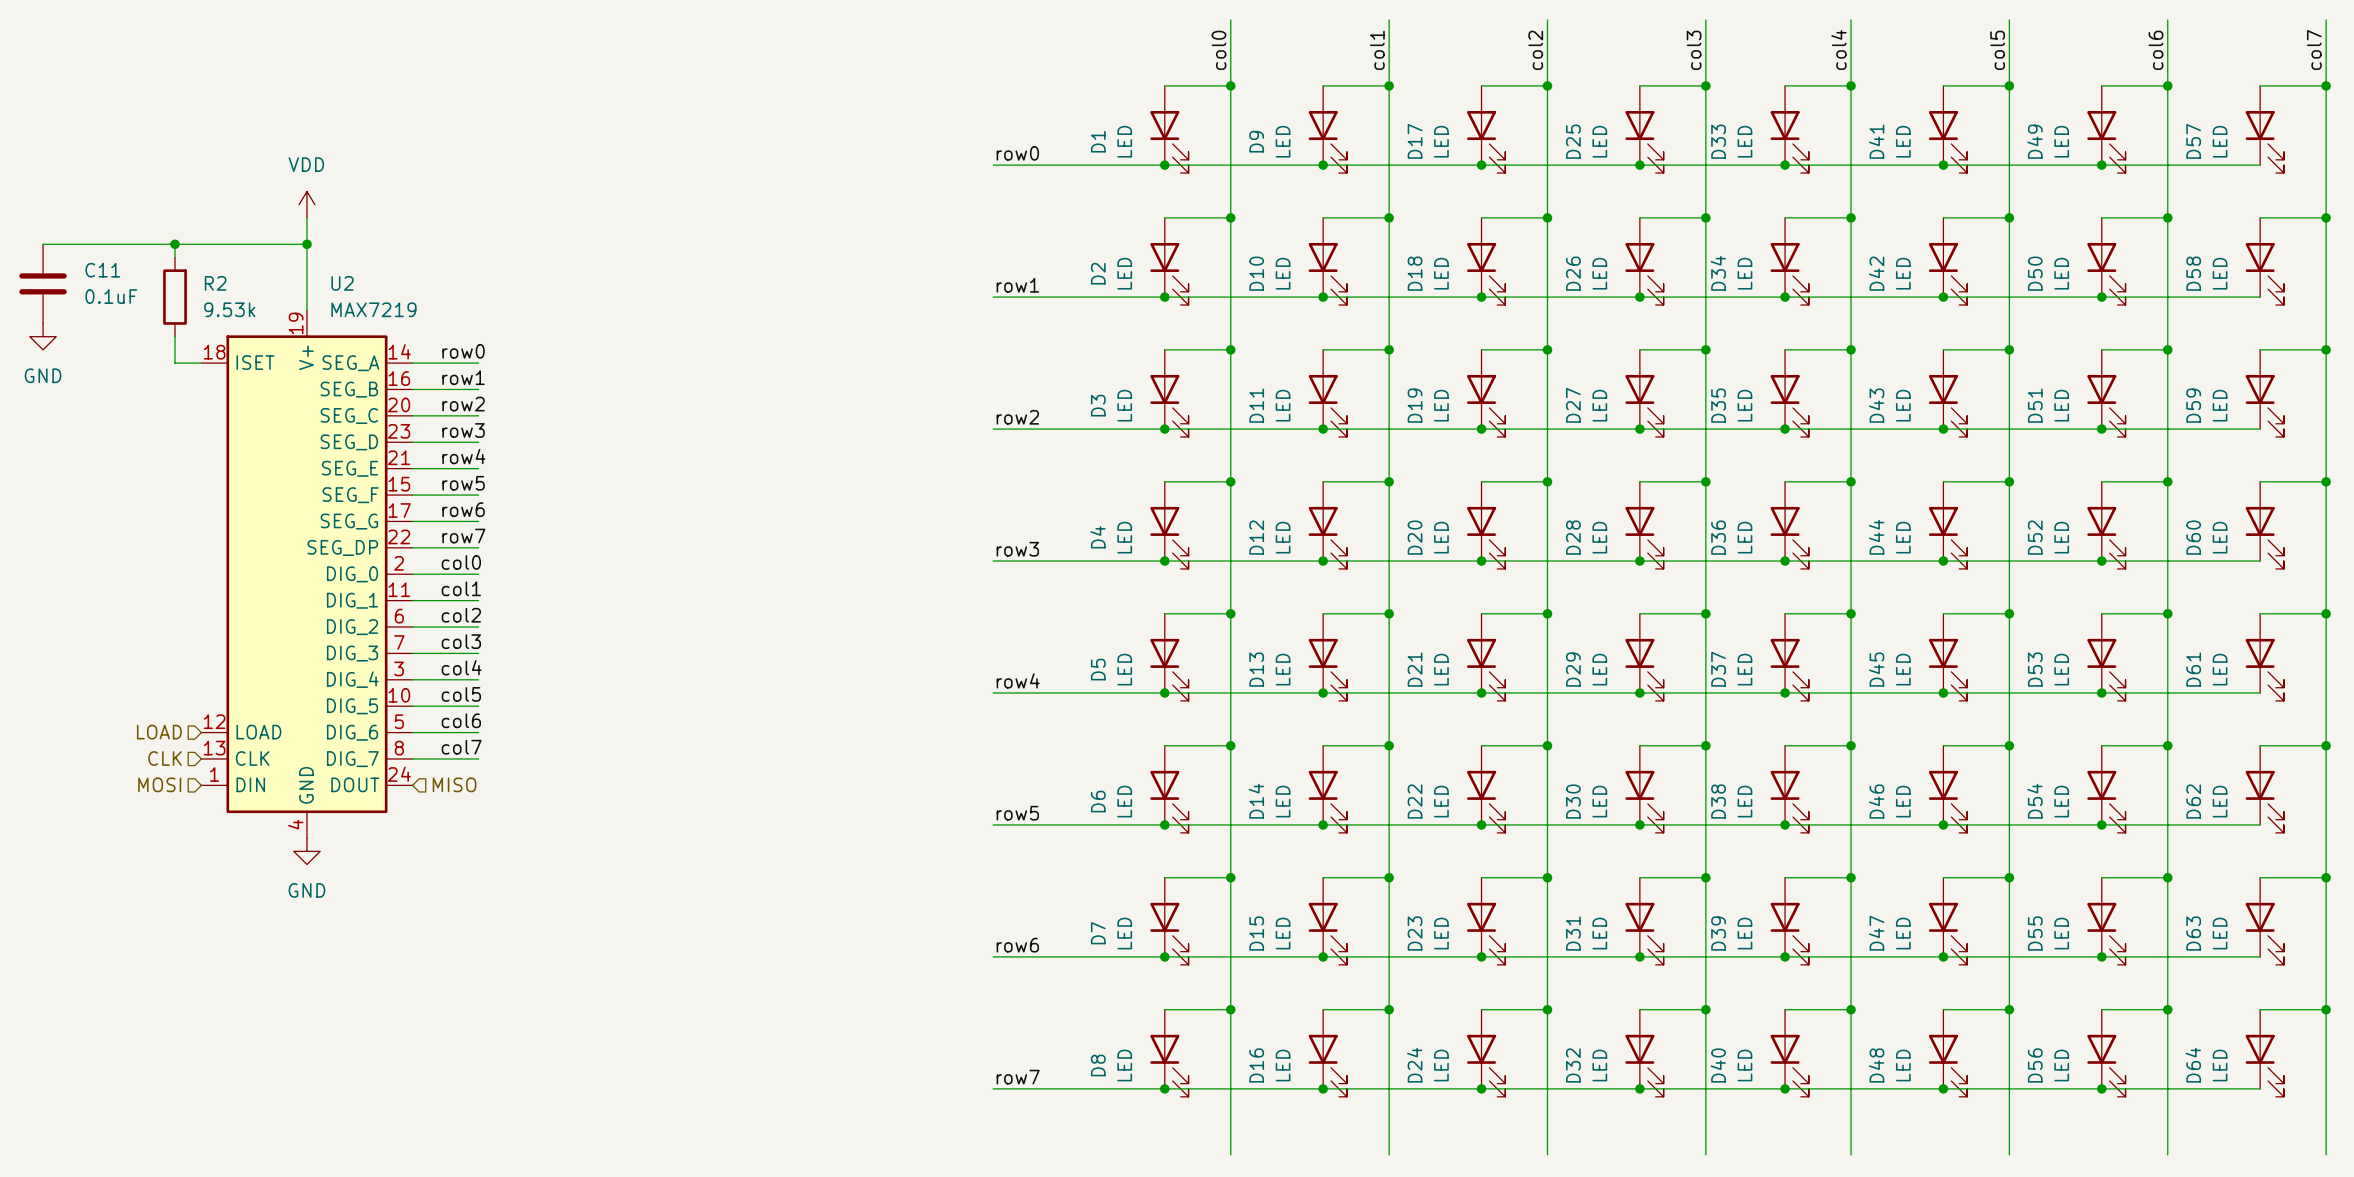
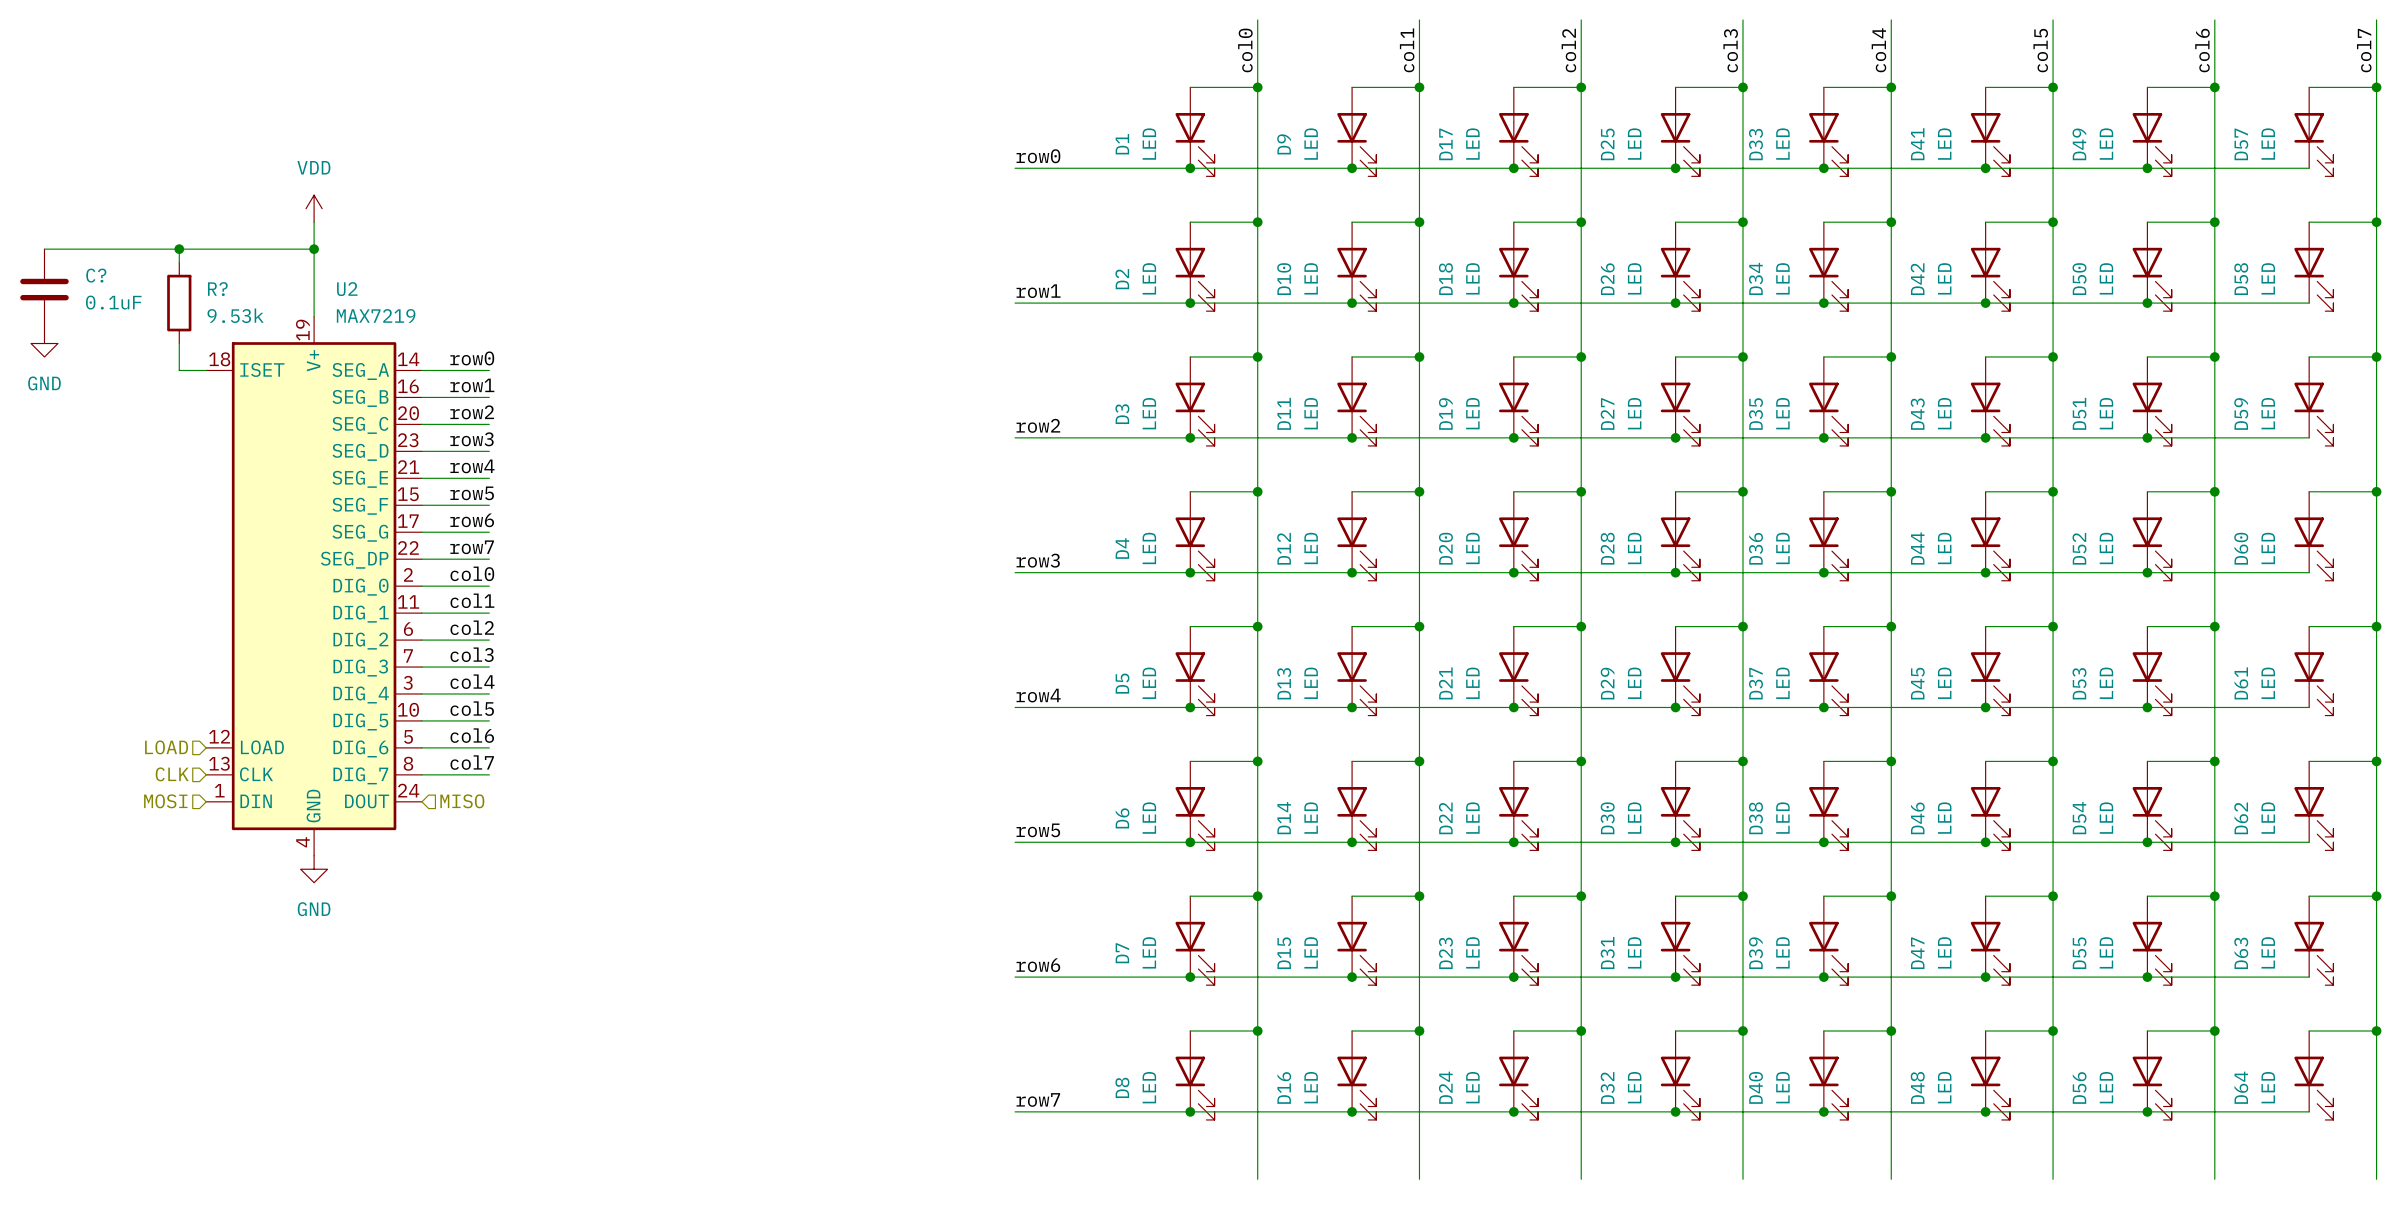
C11 name: C11 (102, 270) -> C? (96, 275)
R2 name: R2 (215, 283) -> R? (217, 289)

